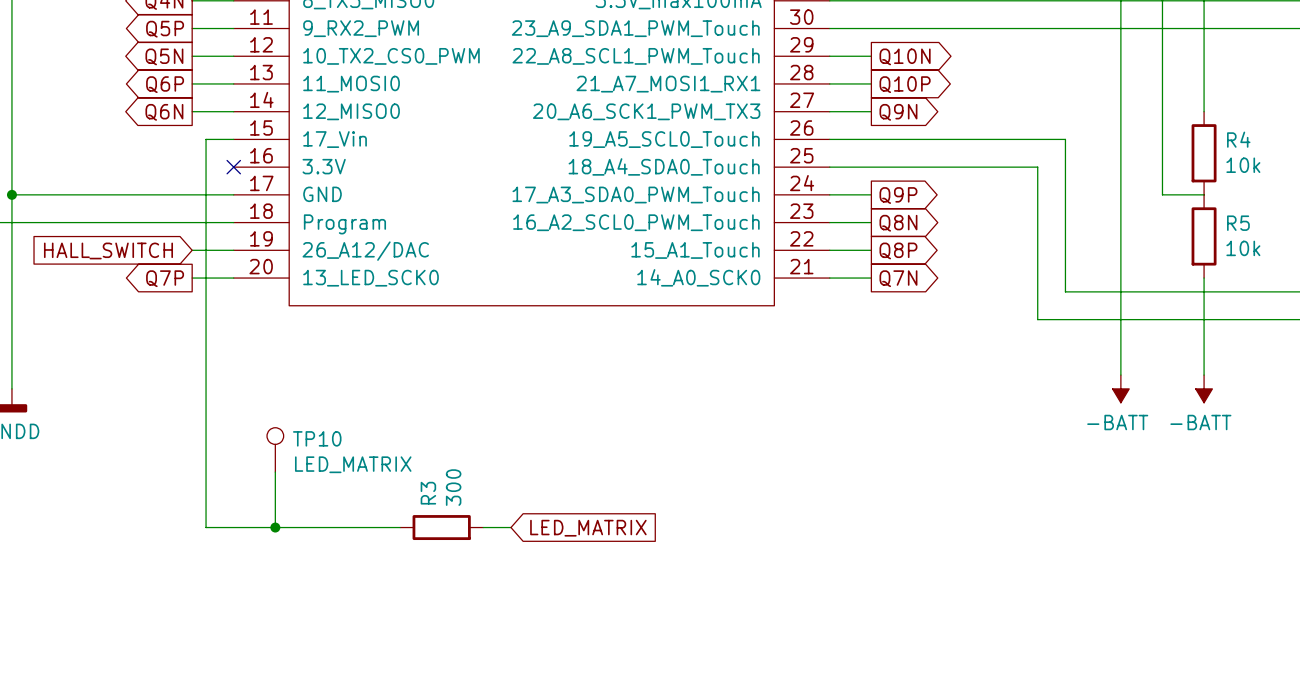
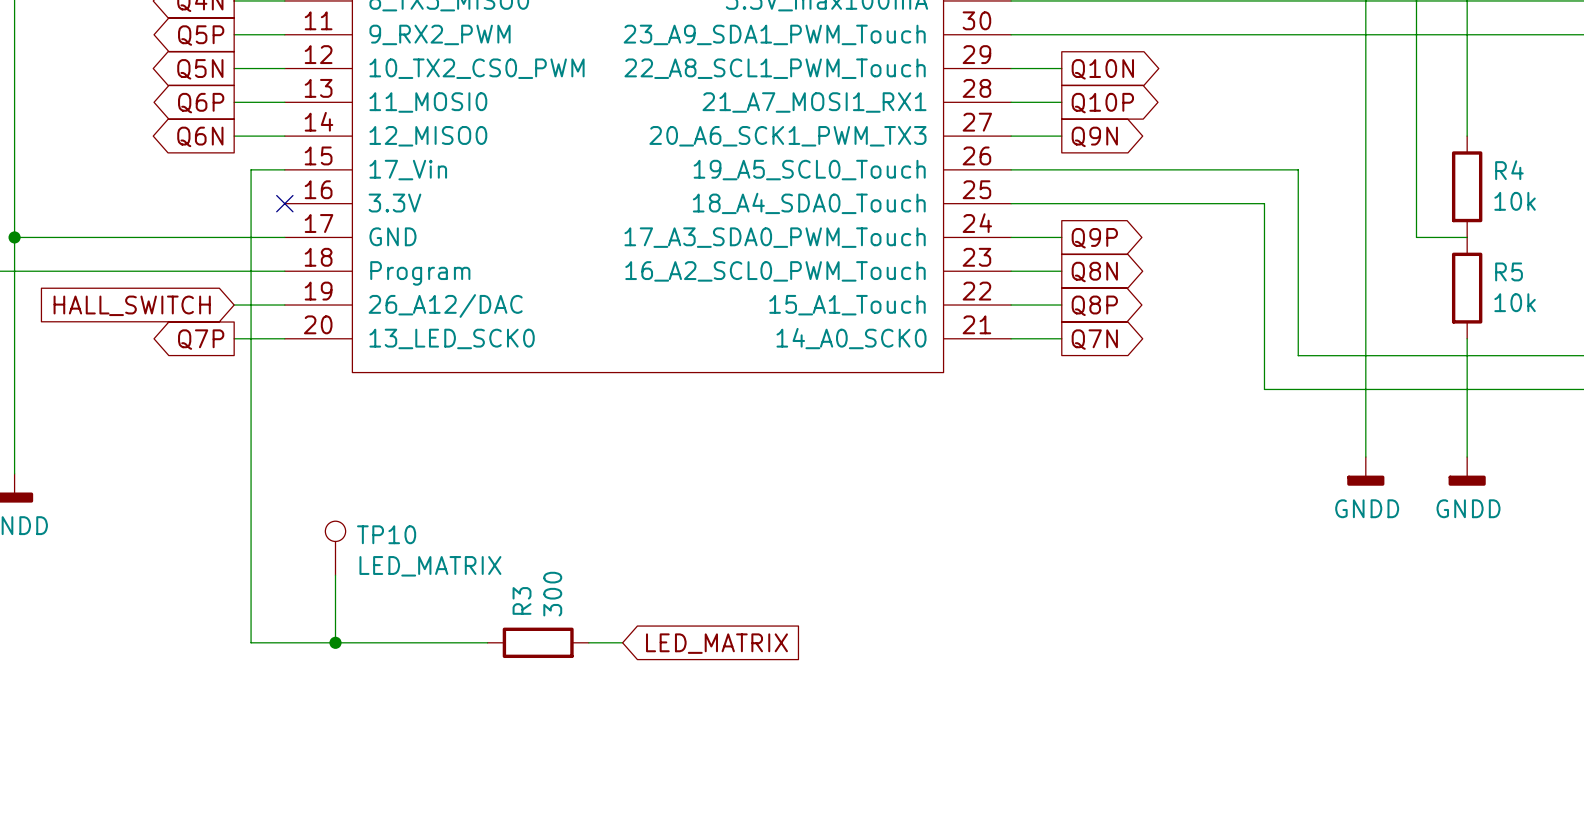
power symbol: -BATT (1120, 388) -> GNDD (1365, 471)
power symbol: -BATT (1204, 388) -> GNDD (1467, 471)

